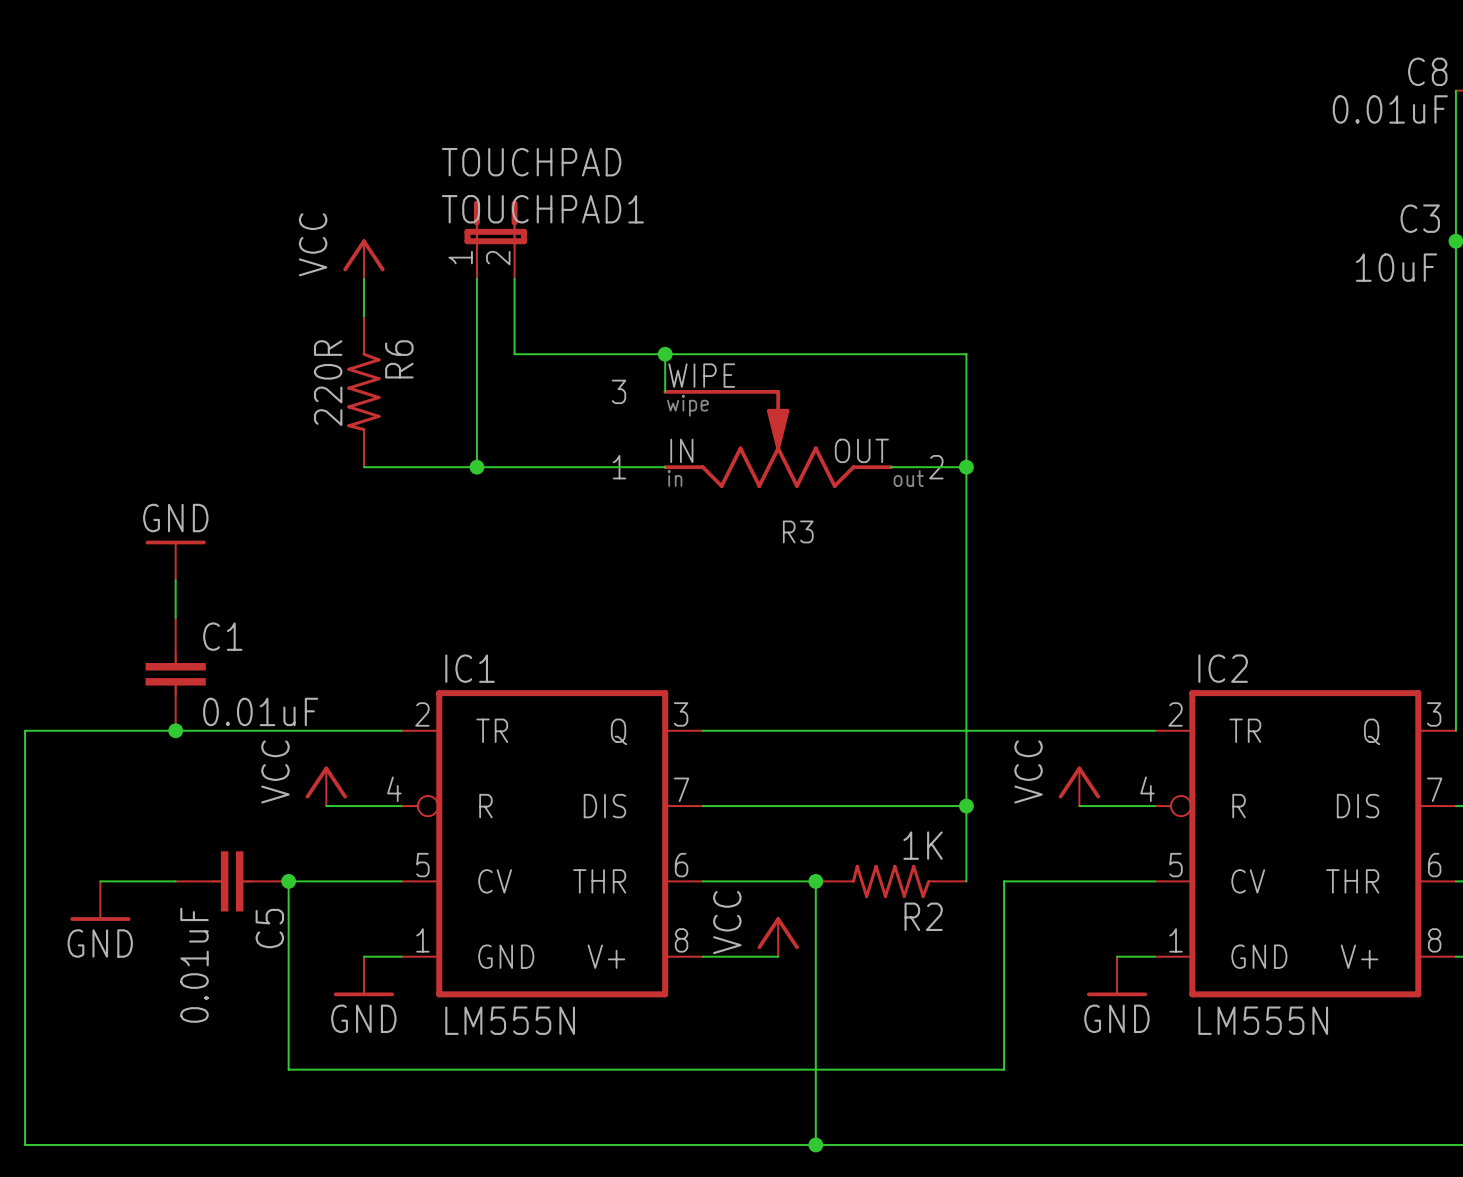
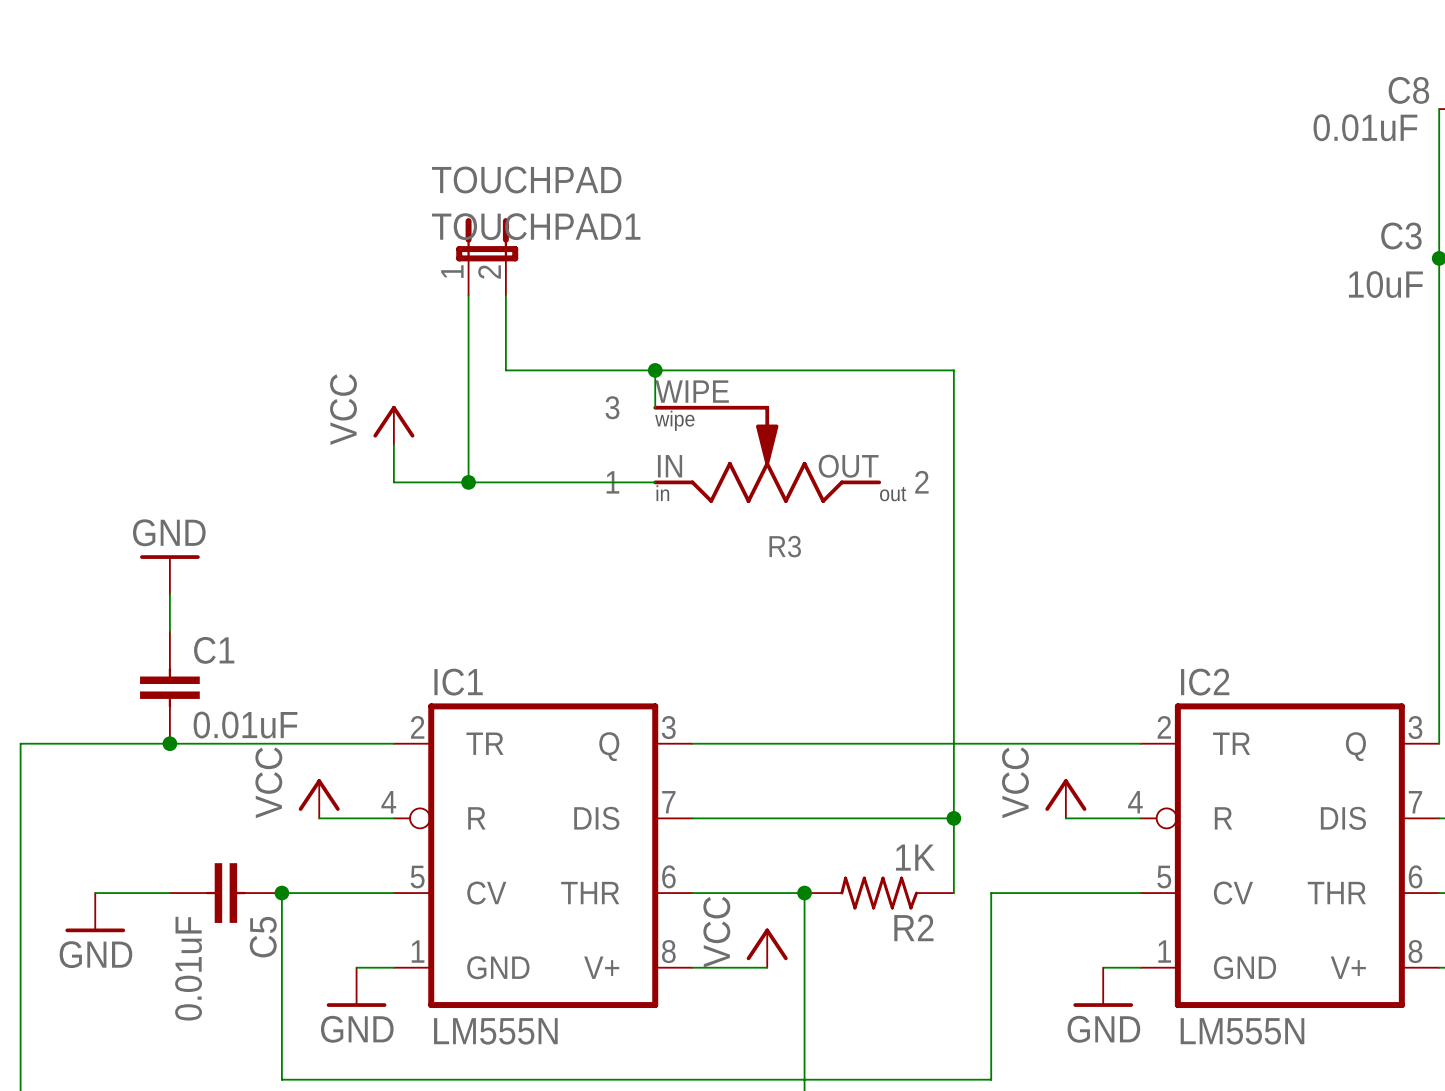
power symbol position: VCC (363, 259) -> VCC (393, 425)
wire: (363, 278) (363, 316) -> none
R6: 220R (363, 391) -> none
wire: (363, 467) (401, 467) -> (393, 445) (393, 482)
wire: (891, 467) (966, 467) -> none
junction: (966, 467) -> none

